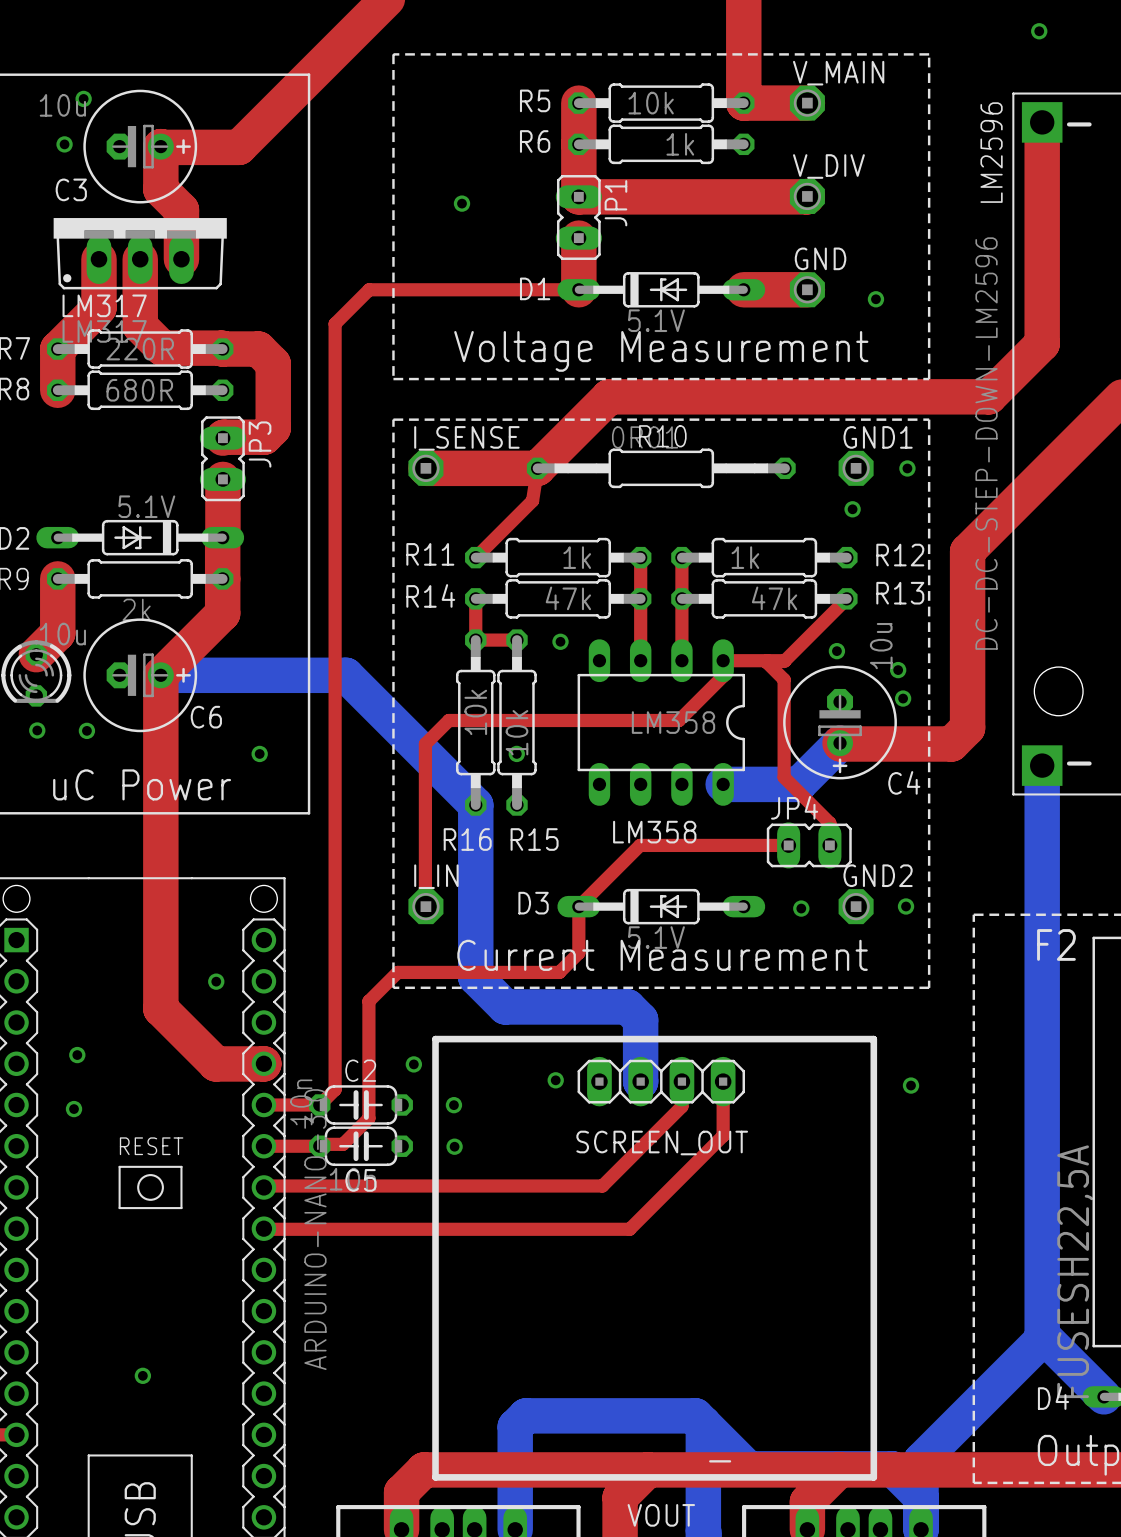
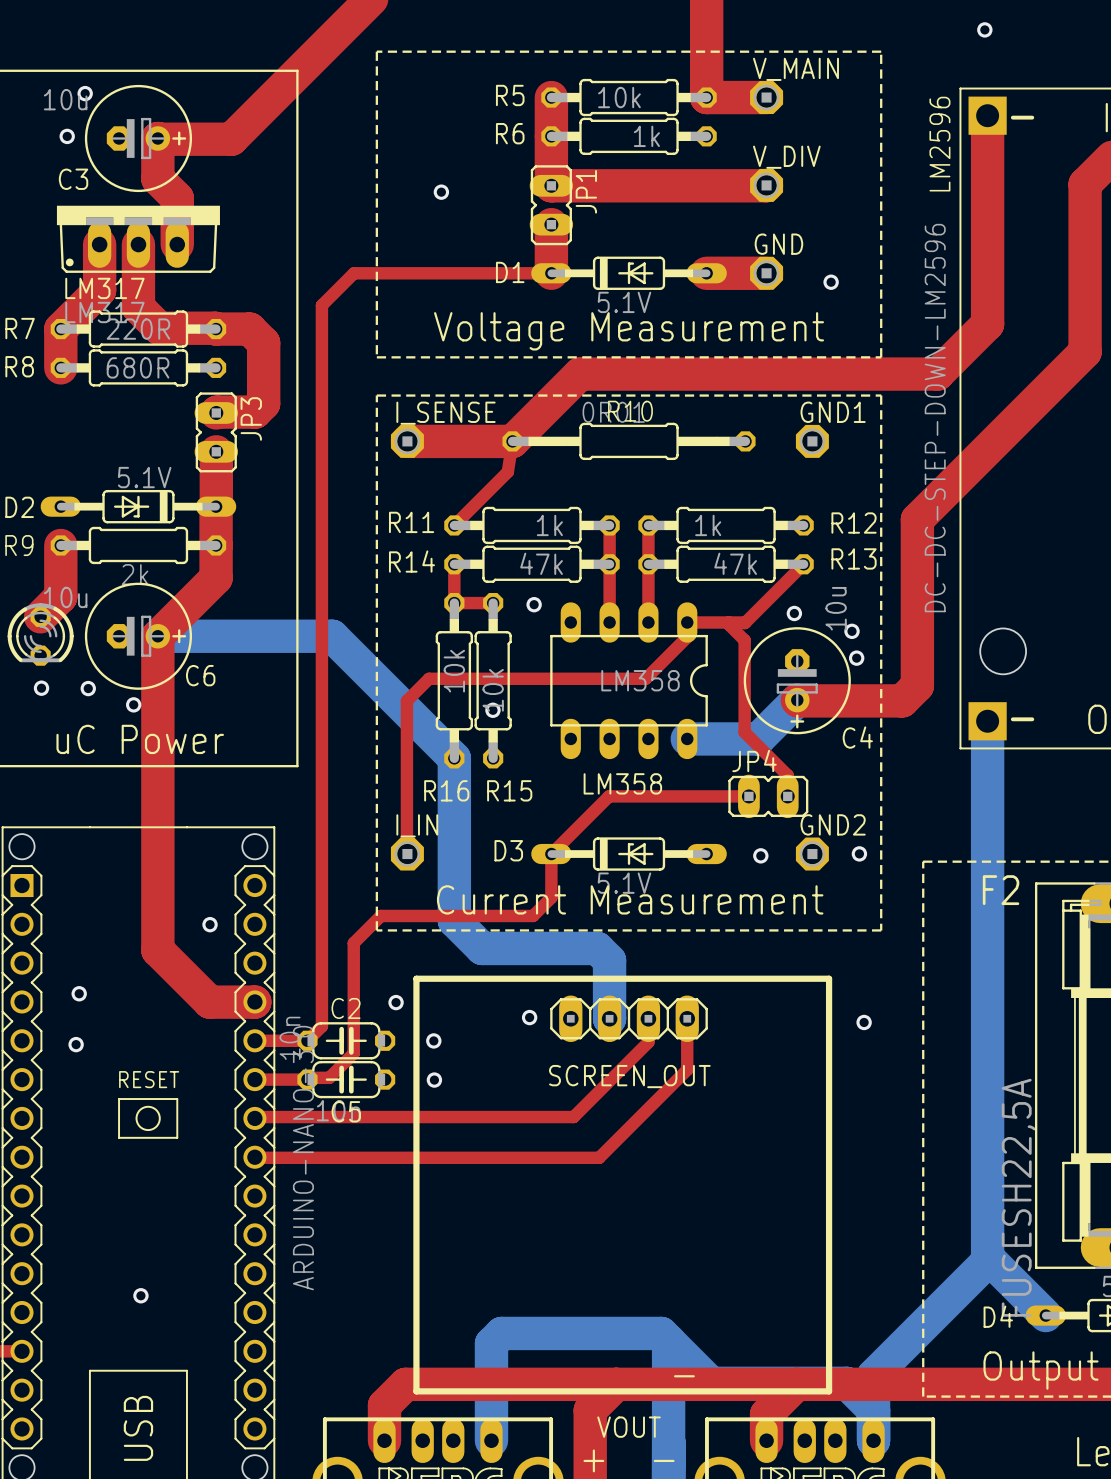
via: (907, 468) -> none
via: (852, 509) -> none
via: none -> (133, 704)
via: (259, 753) -> none

